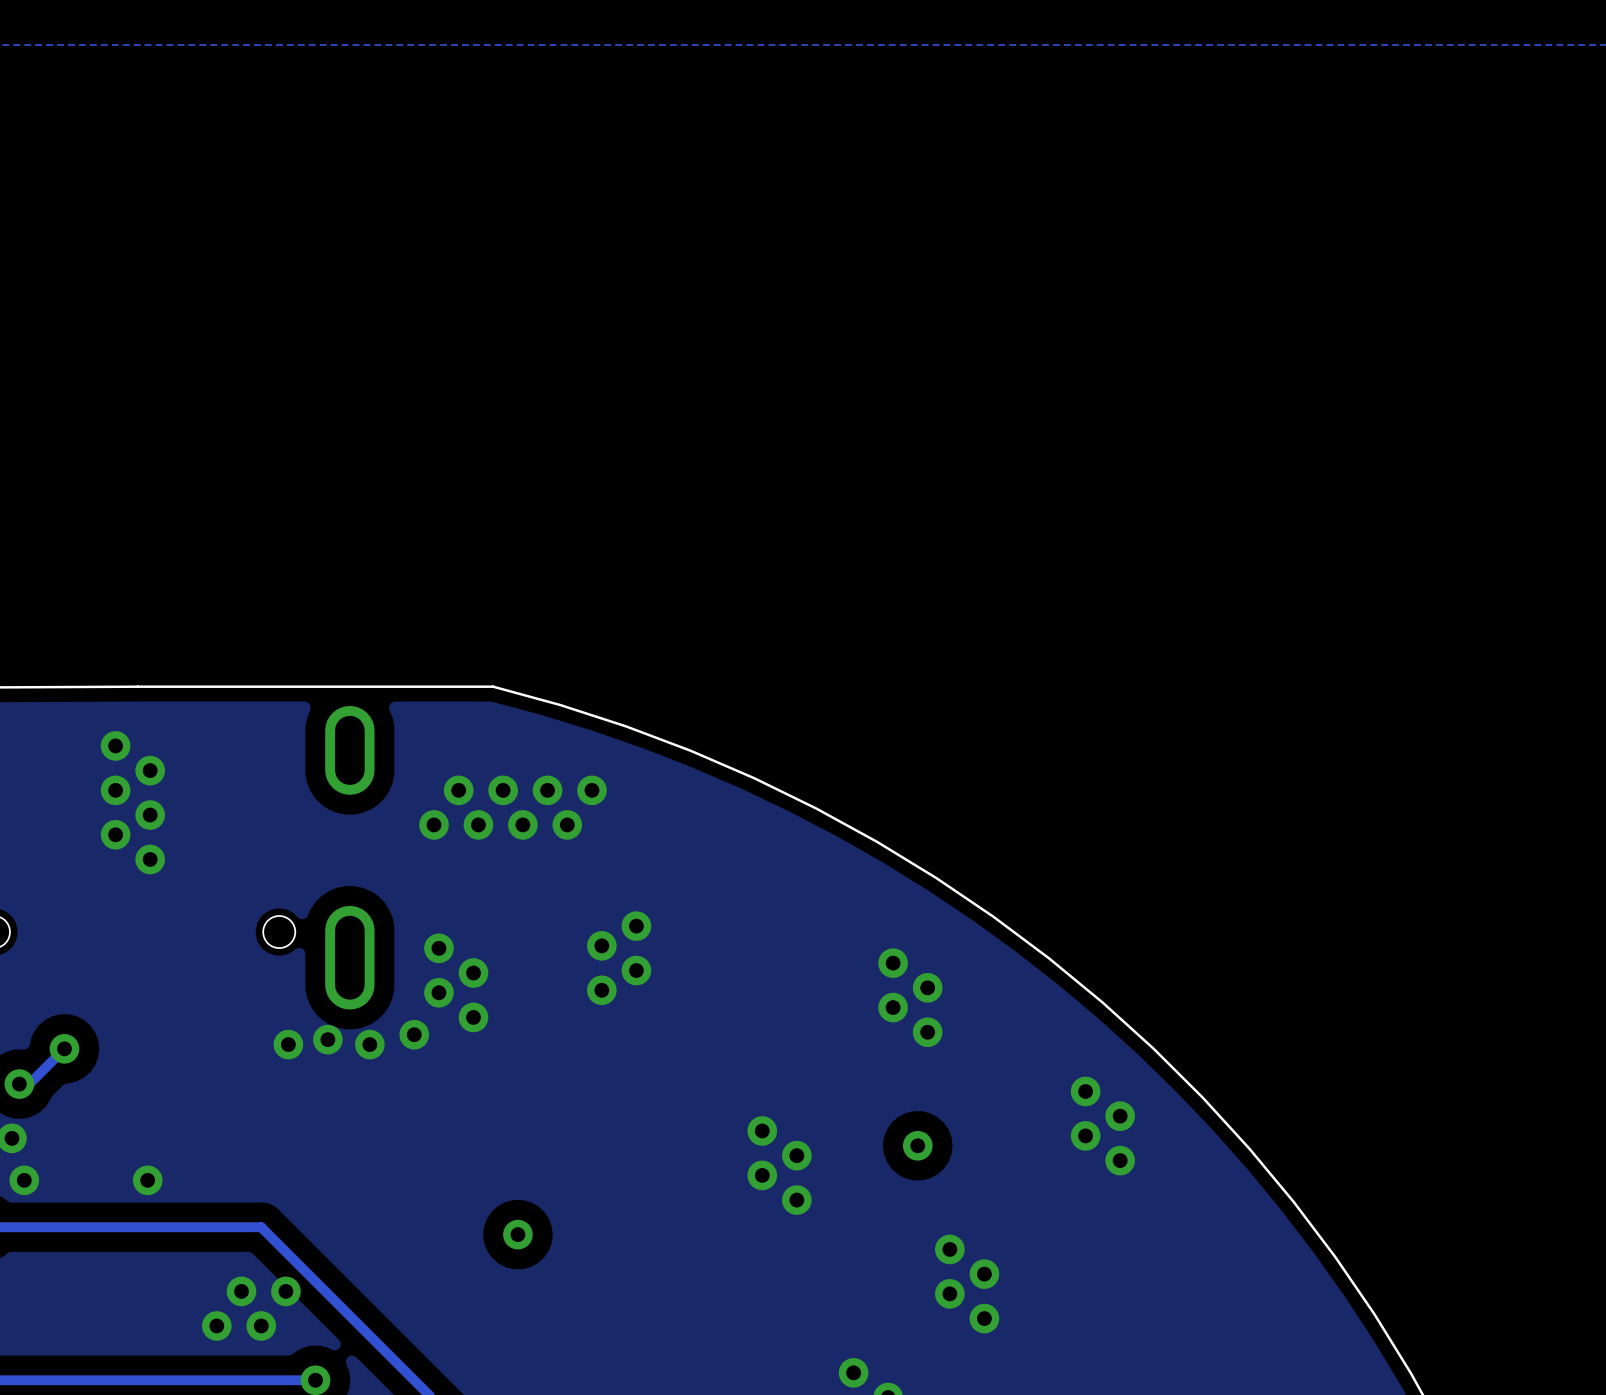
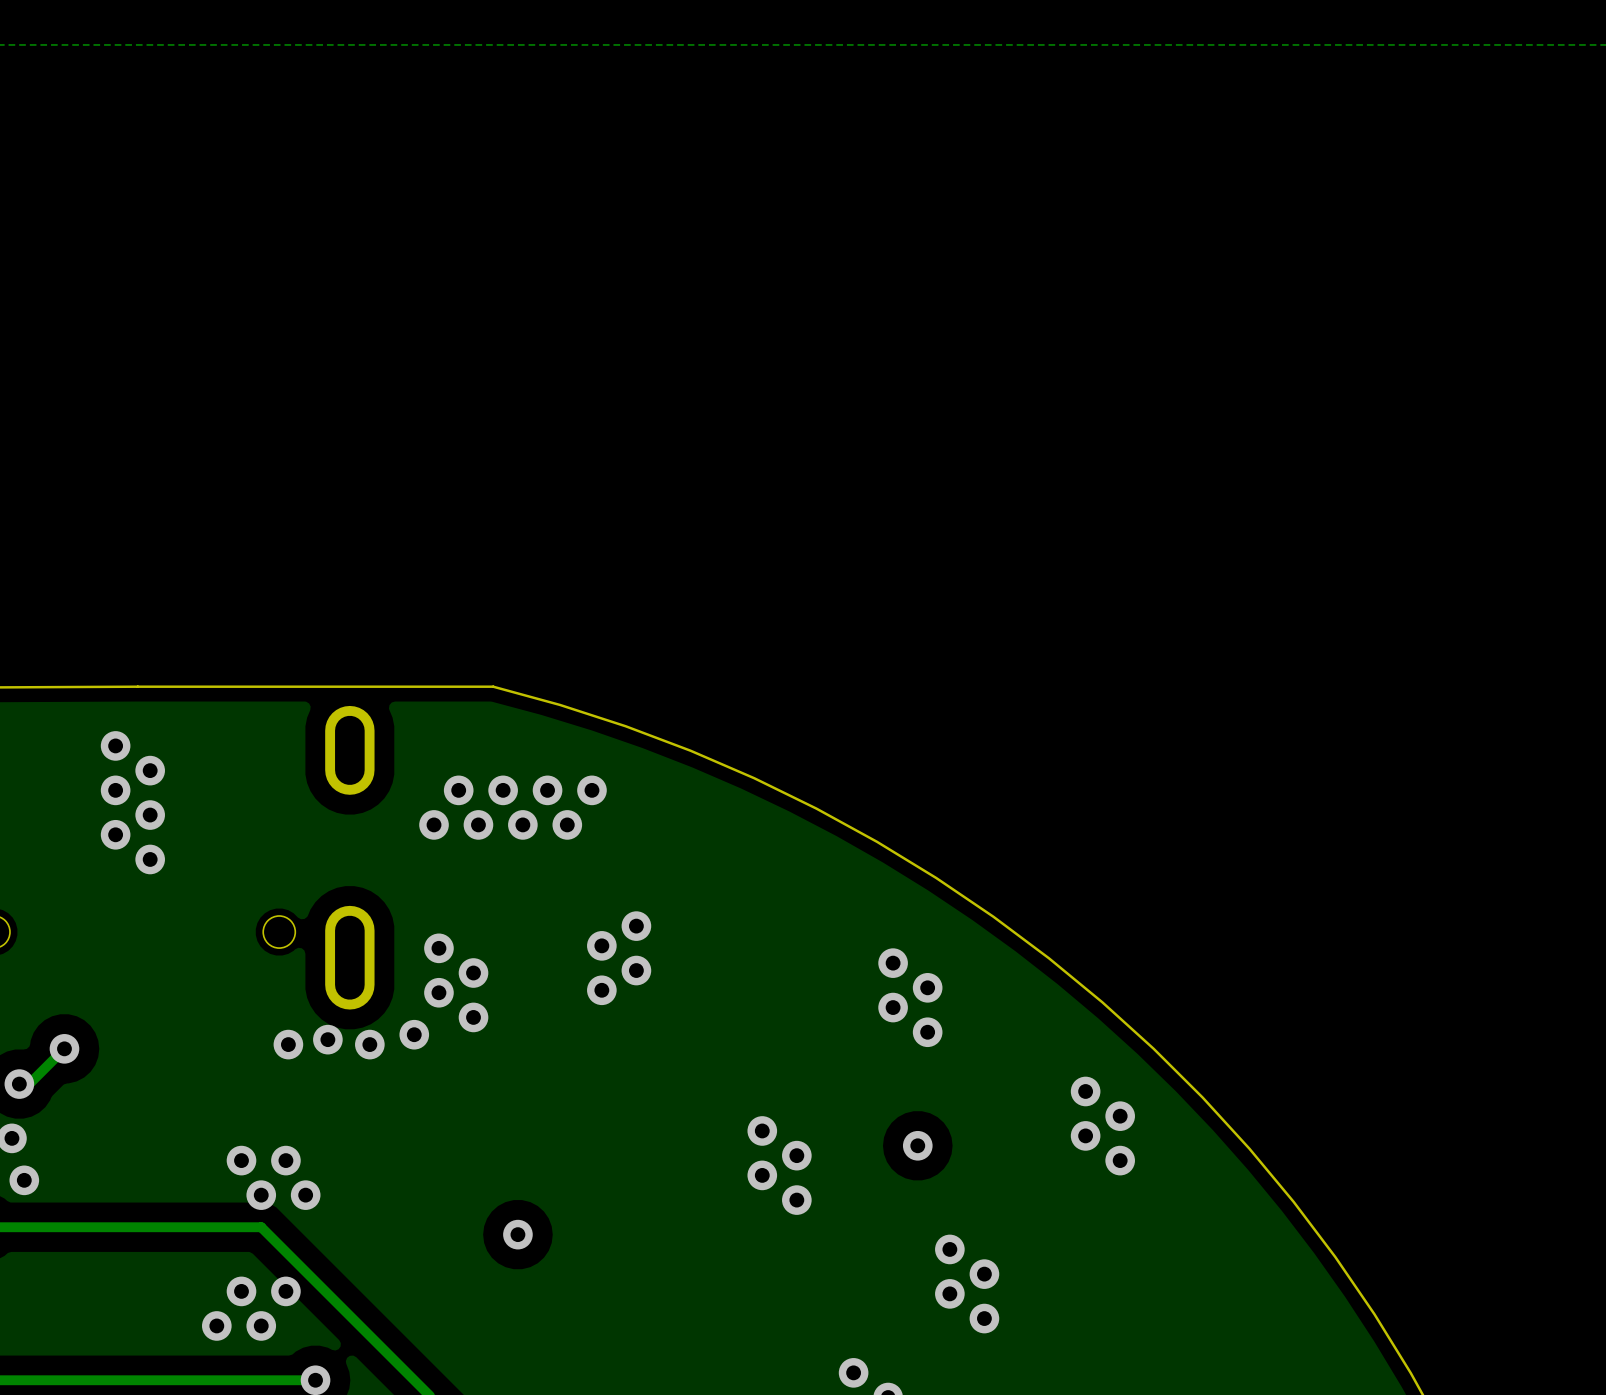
via: none -> (241, 1160)
via: none -> (285, 1160)
via: (147, 1180) -> none
via: none -> (261, 1195)
via: none -> (305, 1195)

